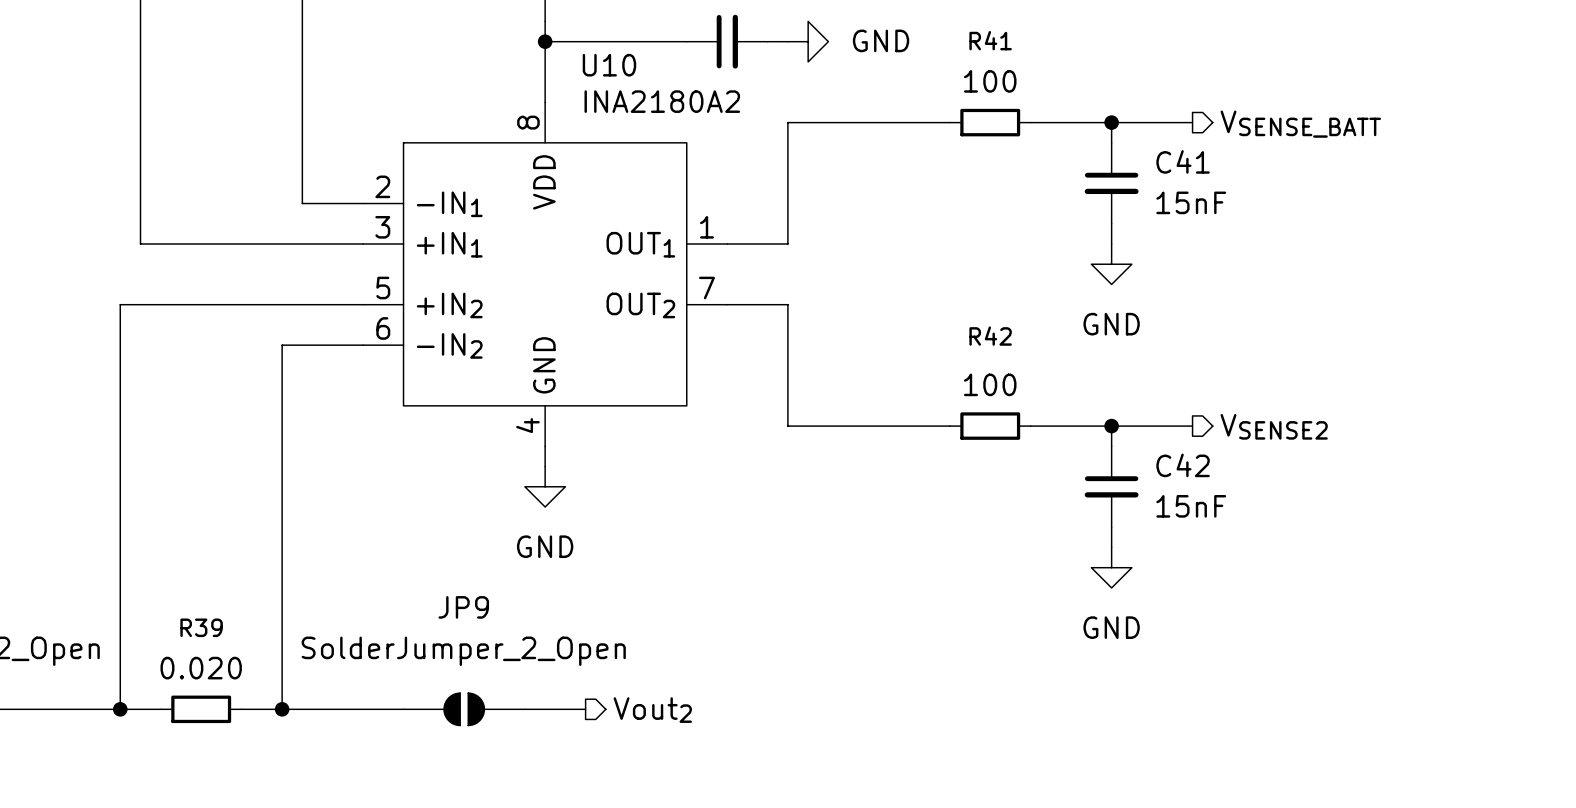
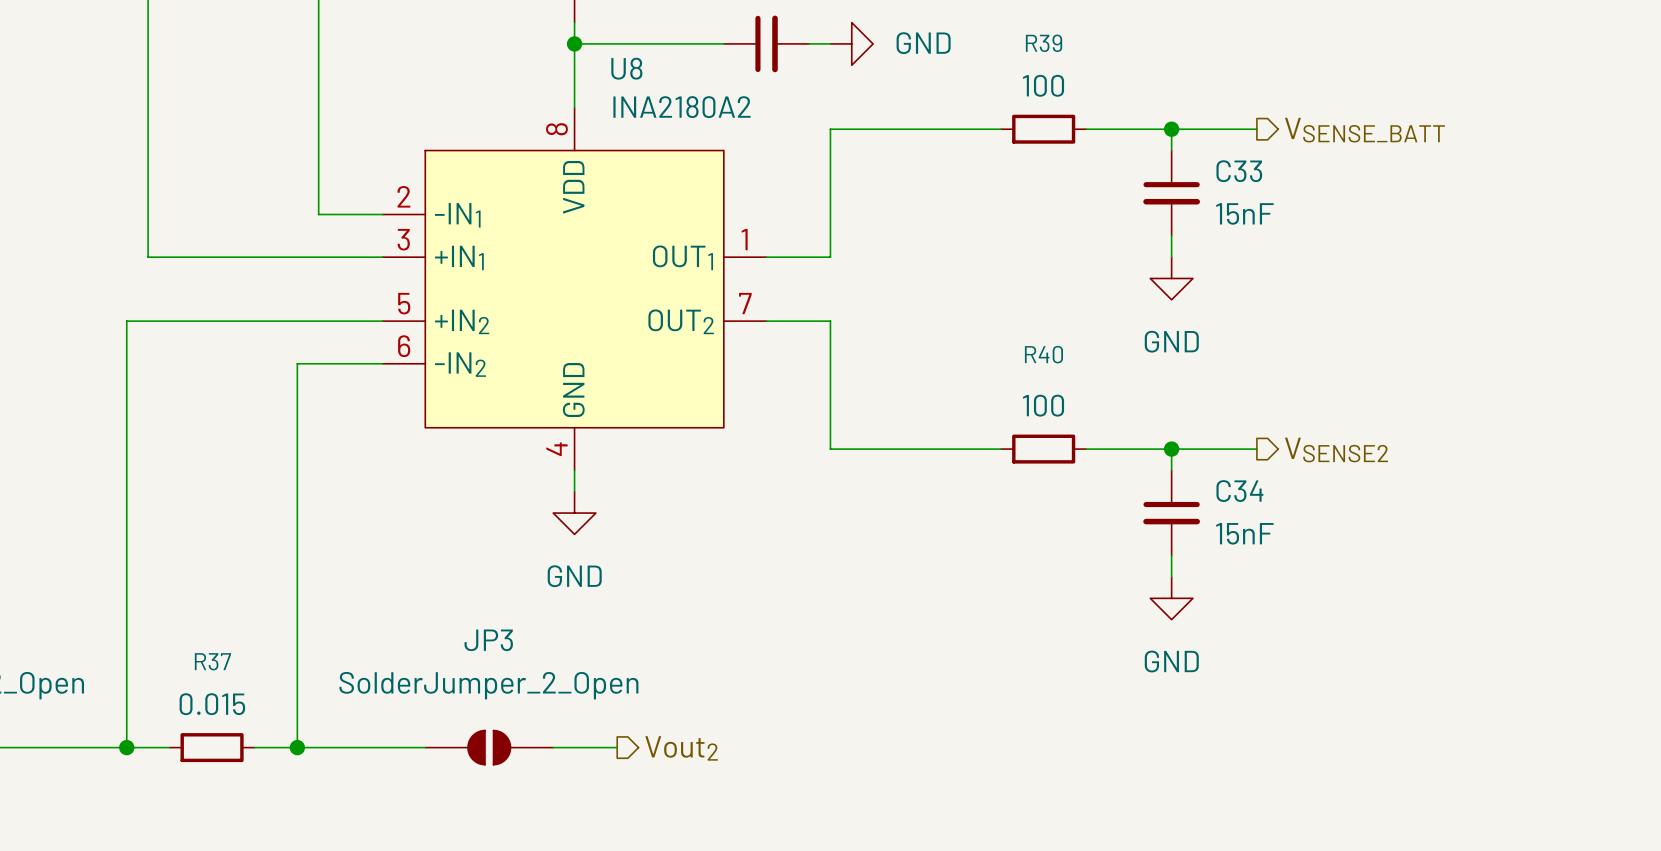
R41 name: R41 (990, 40) -> R39 (1044, 43)
U10 name: U10 (609, 65) -> U8 (626, 68)
C41 name: C41 (1183, 161) -> C33 (1239, 171)
R42 name: R42 (990, 336) -> R40 (1043, 354)
C42 name: C42 (1183, 465) -> C34 (1239, 491)
JP9 name: JP9 (463, 607) -> JP3 (488, 640)
R39 name: R39 (201, 627) -> R37 (212, 661)
R39 value: 0.020 (201, 668) -> 0.015 (212, 704)

